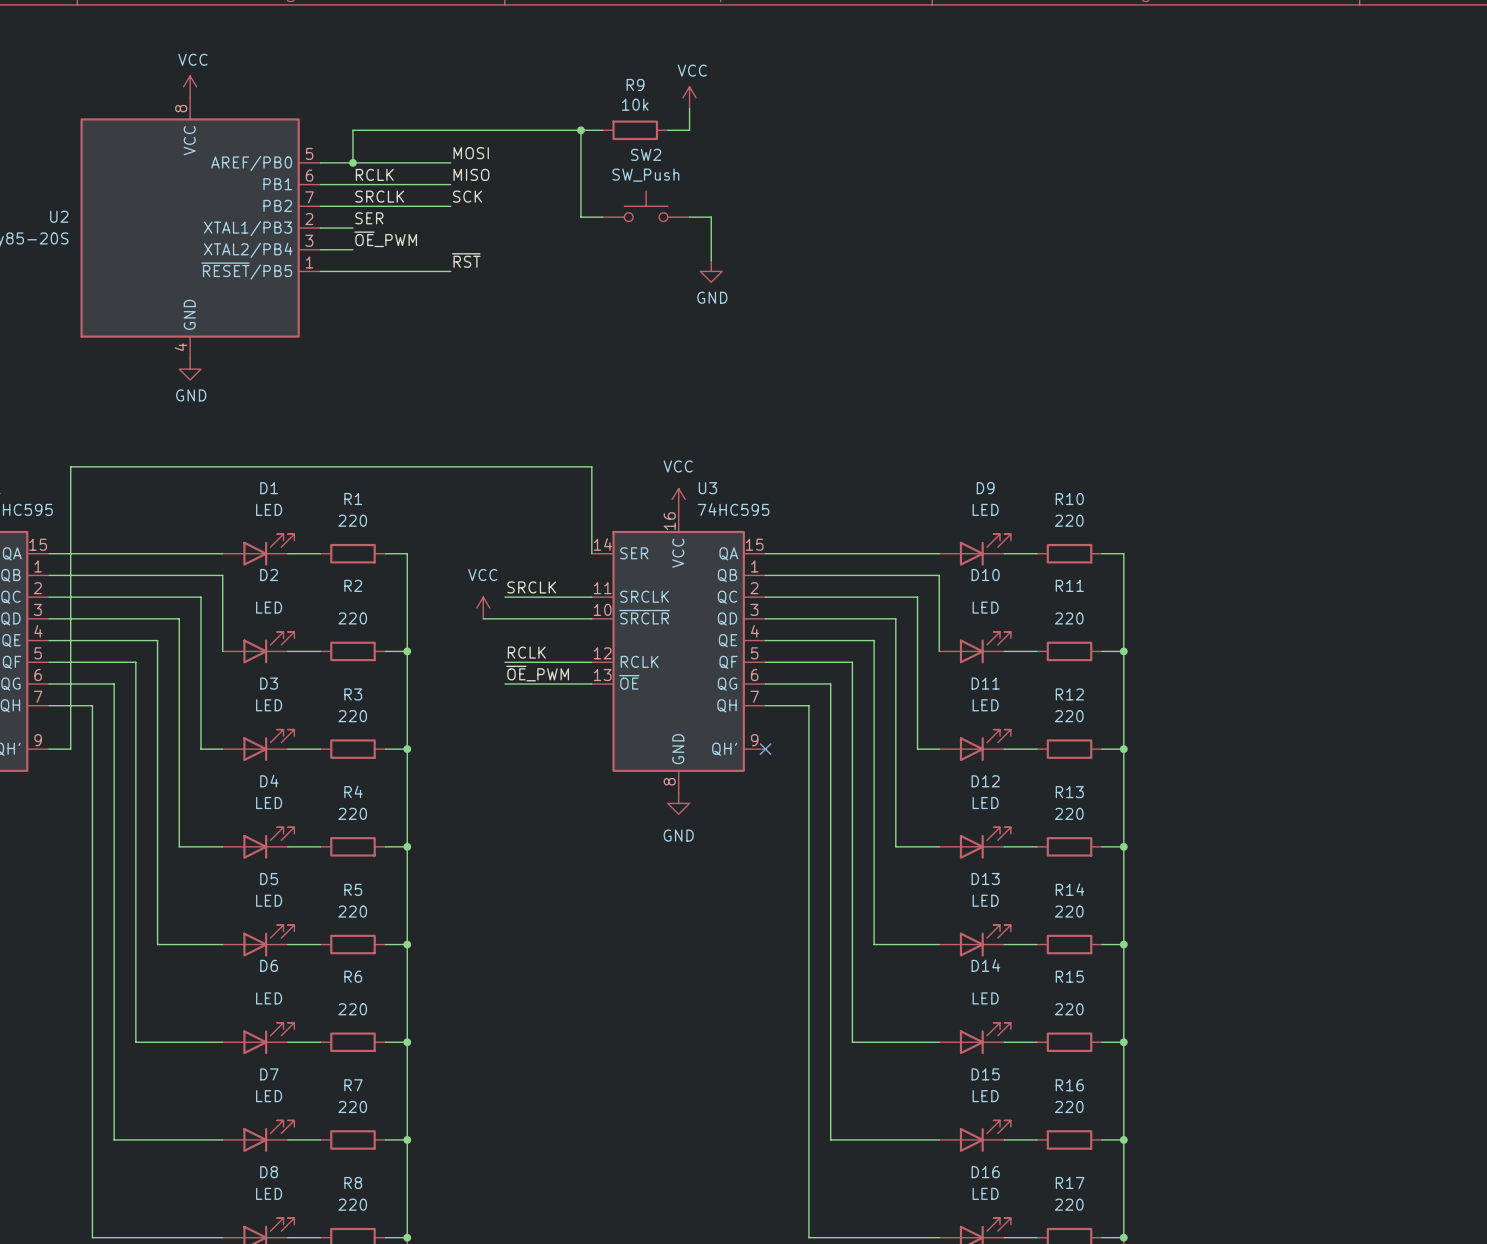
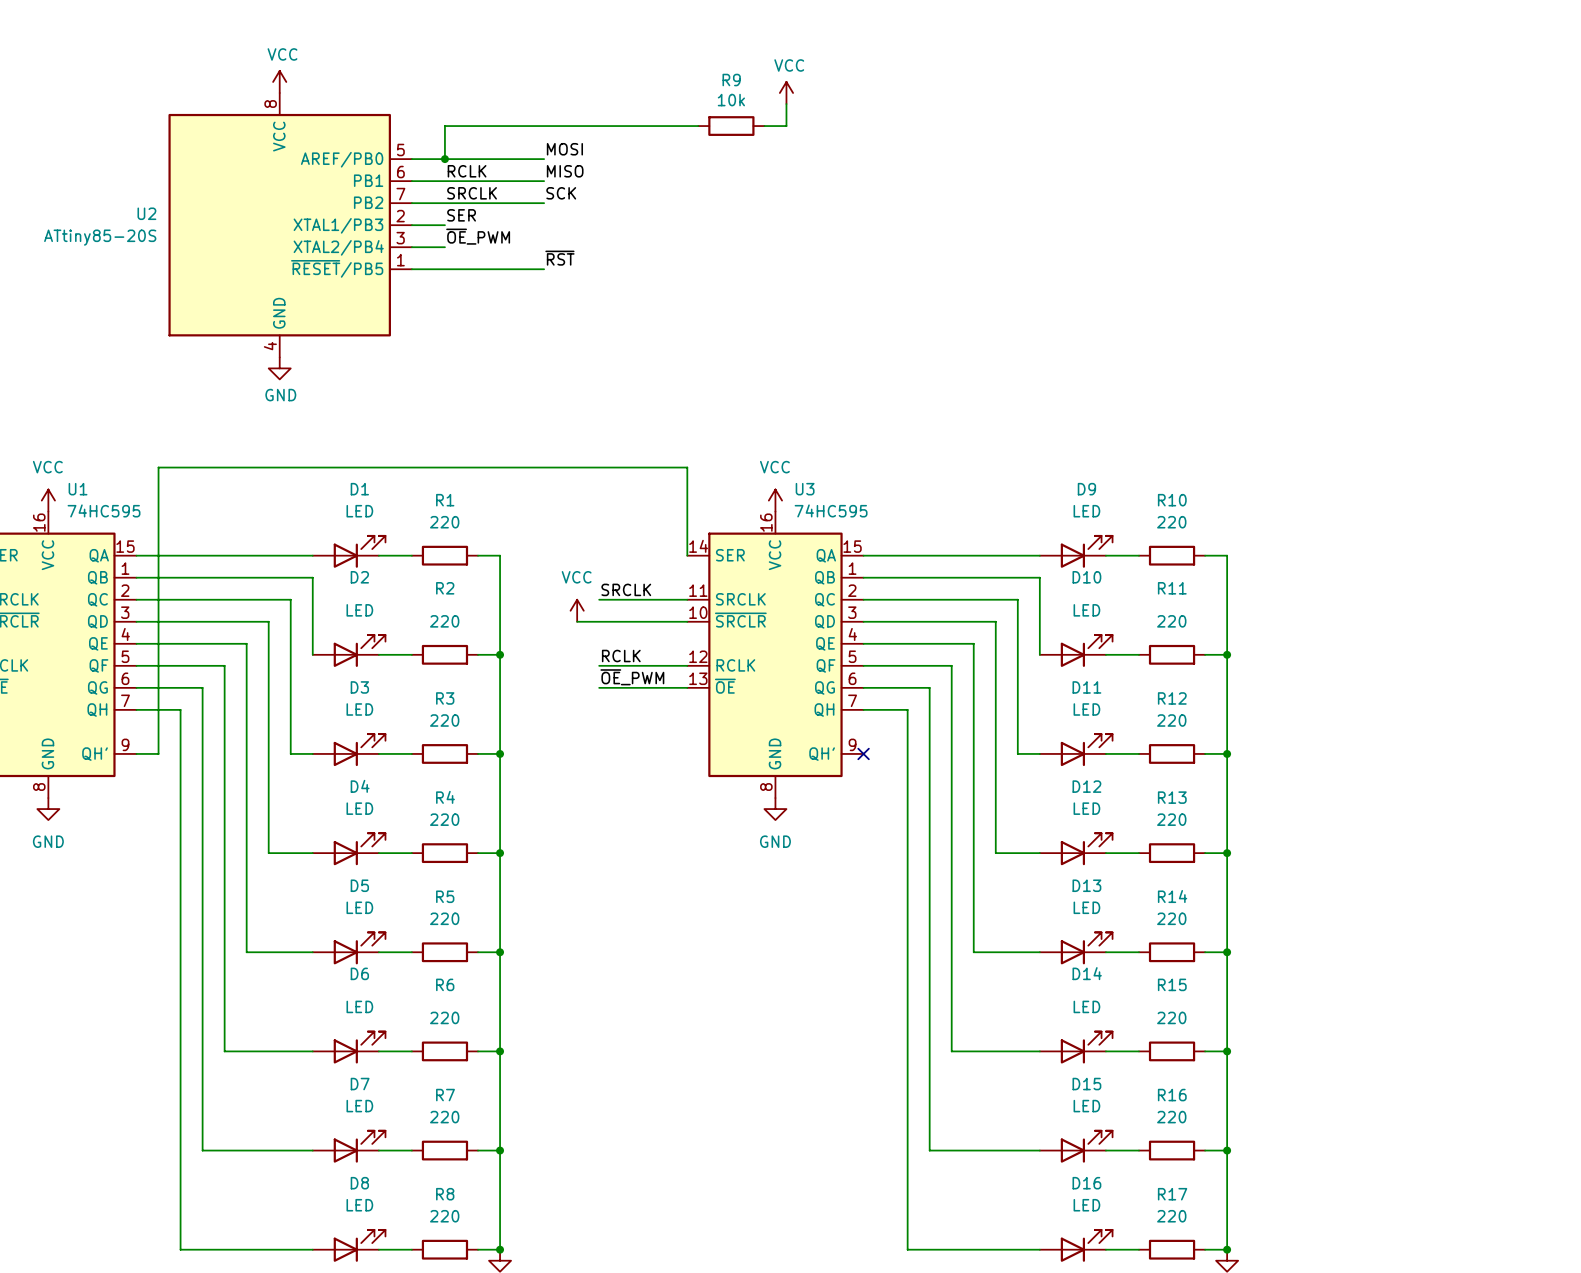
wire: (580, 130) (580, 217) (602, 217) -> none
junction: (580, 130) -> none
SW2: SW_Push (646, 206) -> none
wire: (689, 217) (711, 217) (711, 260) -> none
power symbol: GND (711, 271) -> none

